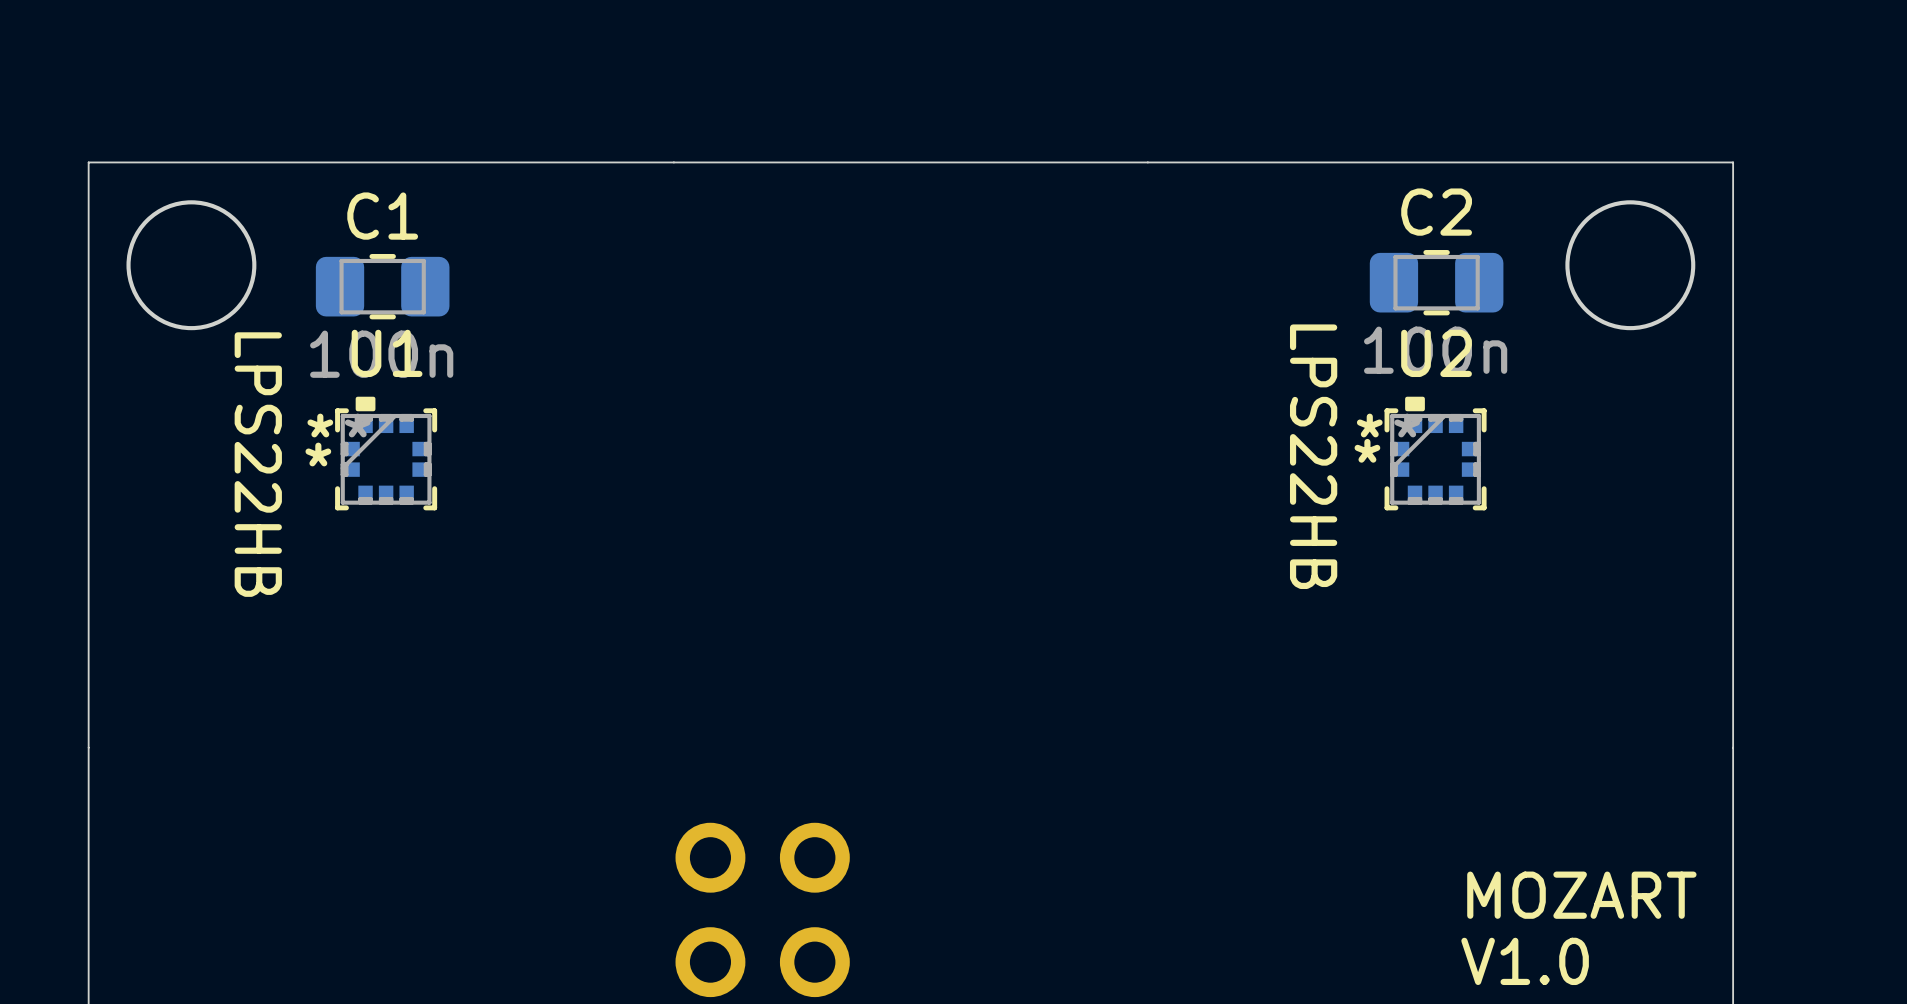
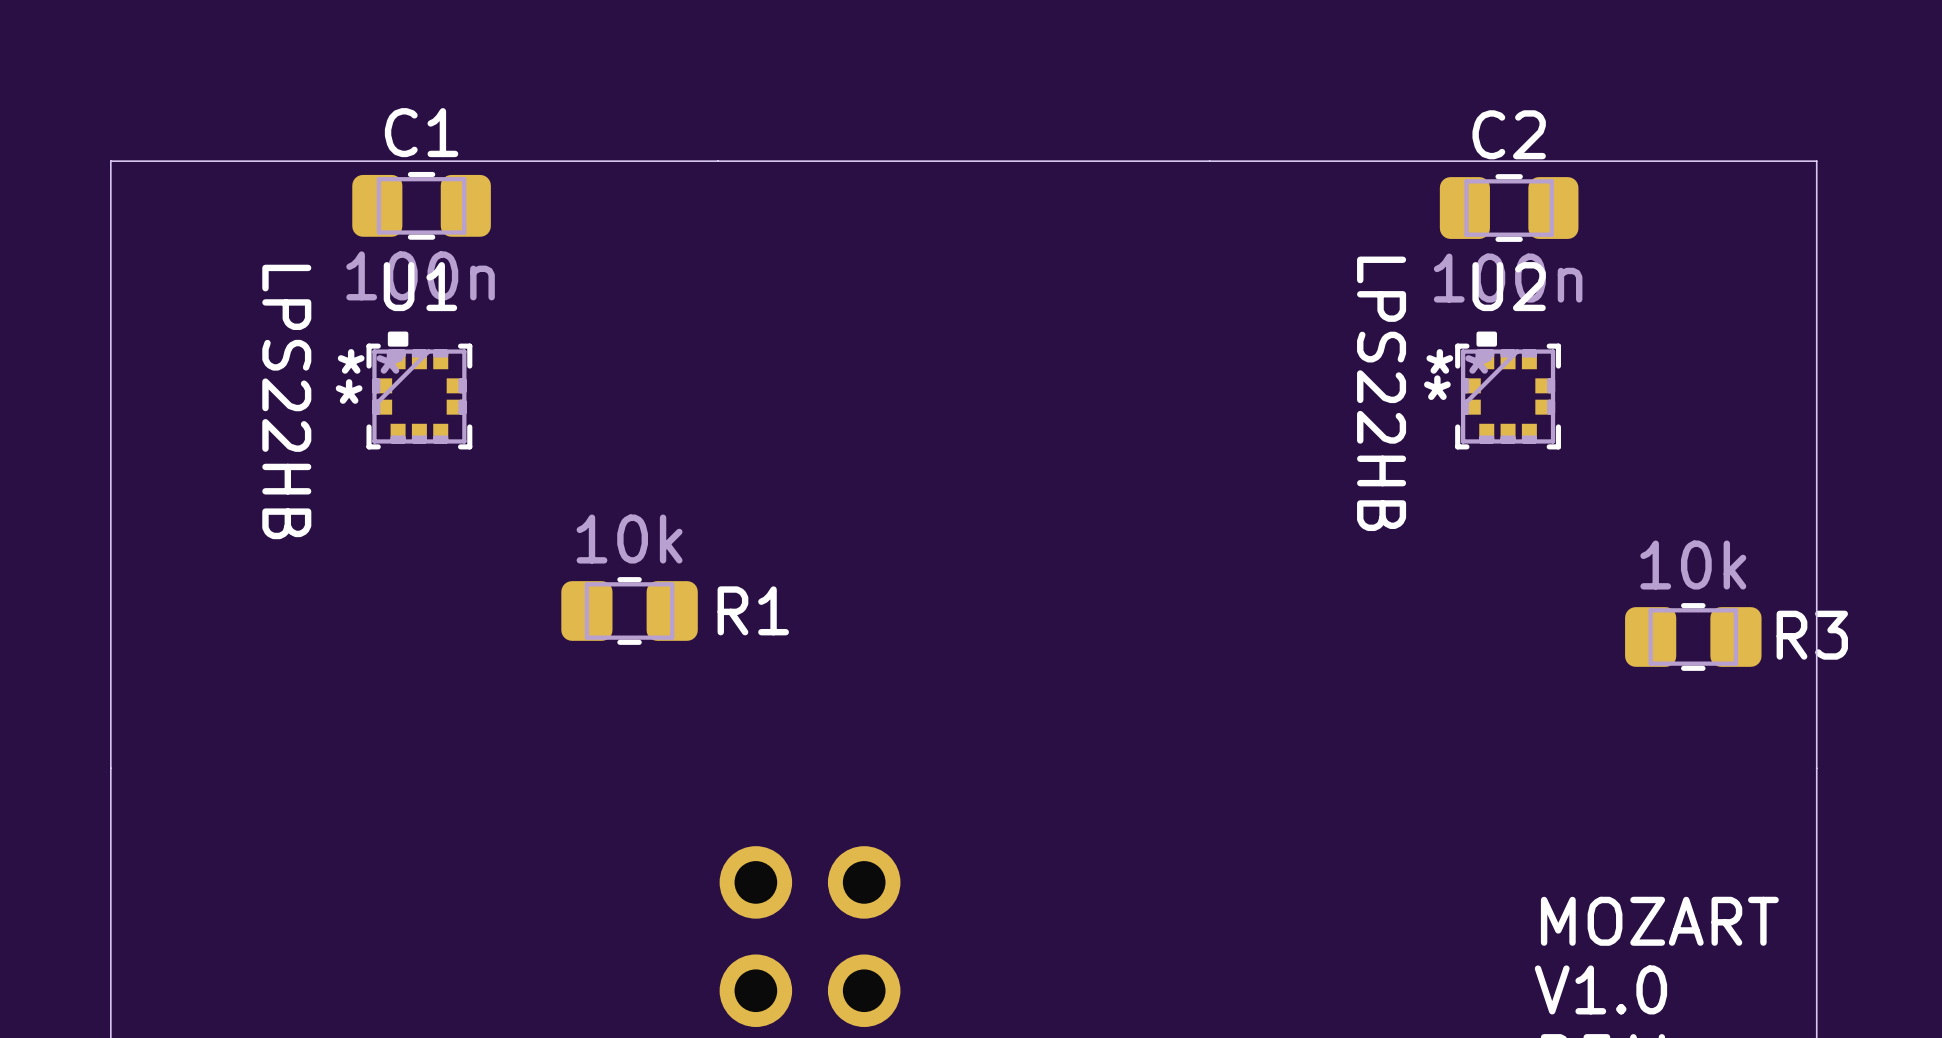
round board edge: [126, 200, 257, 331] -> none
round board edge: [1565, 200, 1696, 331] -> none
C2 position: (1436, 282) -> (1509, 208)
C1 position: (382, 286) -> (421, 205)
U1 position: (386, 453) -> (419, 390)
U2 position: (1435, 453) -> (1508, 390)
R1: none -> 10k (629, 610)
R3: none -> 10k (1693, 636)

